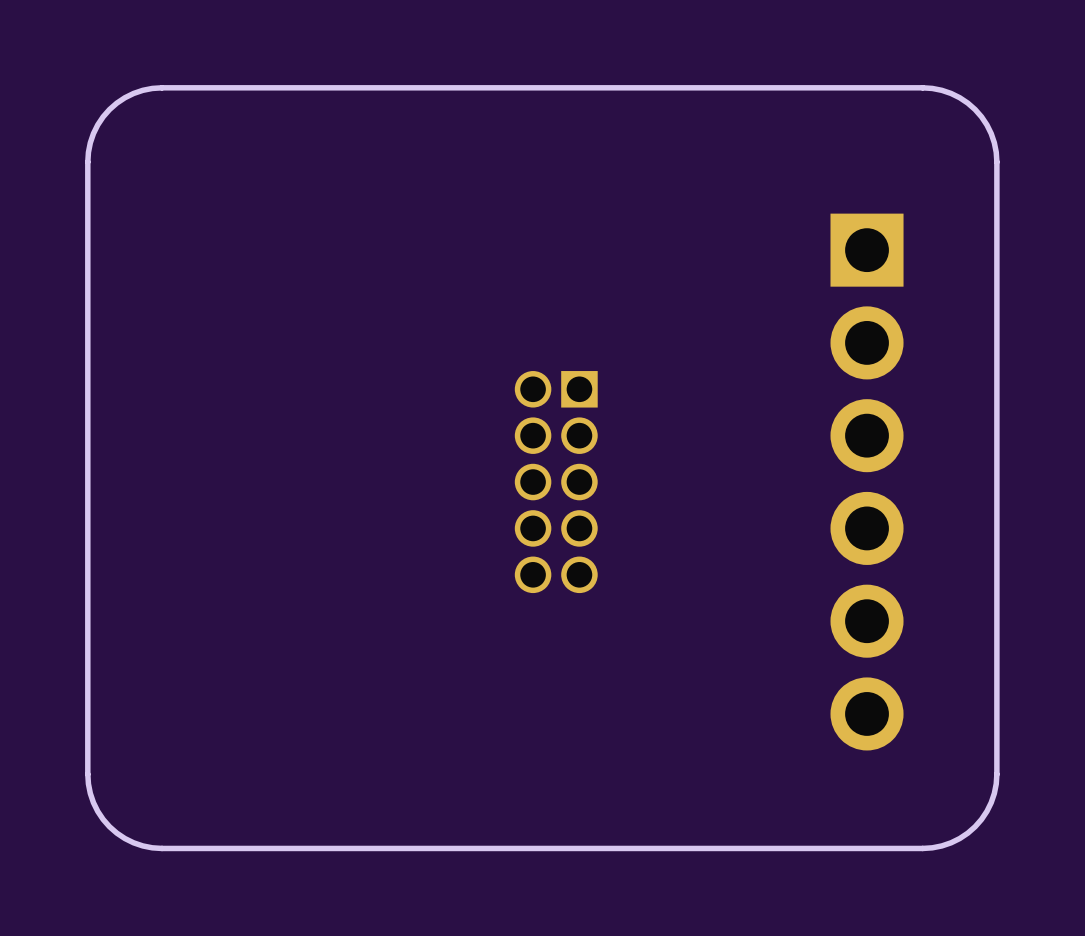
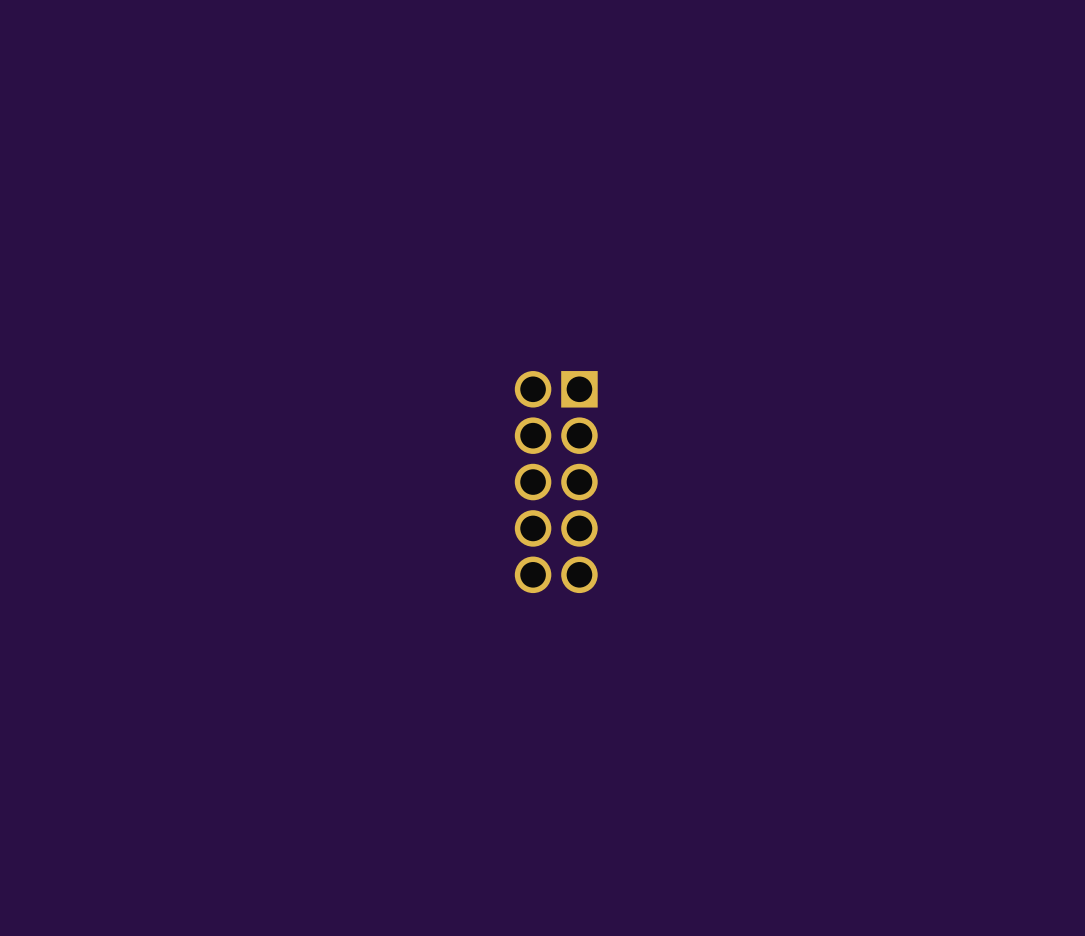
board edge: (922, 87) (162, 87) (133, 93) (109, 109) (93, 133) (87, 162) (87, 774) (93, 802) (109, 826) (133, 842) (162, 848) (922, 848) (951, 842) (975, 826) (991, 802) (996, 774) (996, 152) (986, 124) (975, 109) (951, 93) (922, 87) -> none
part: (867, 482) -> none

